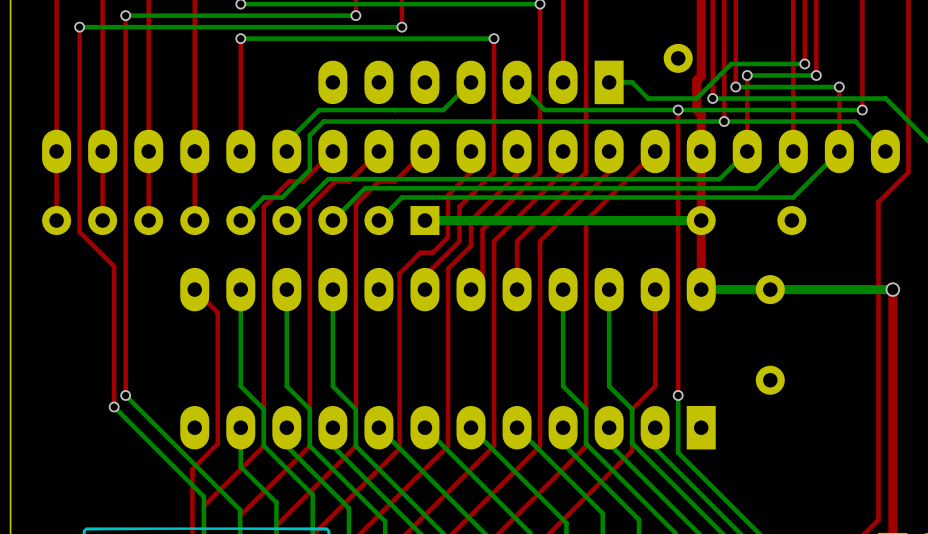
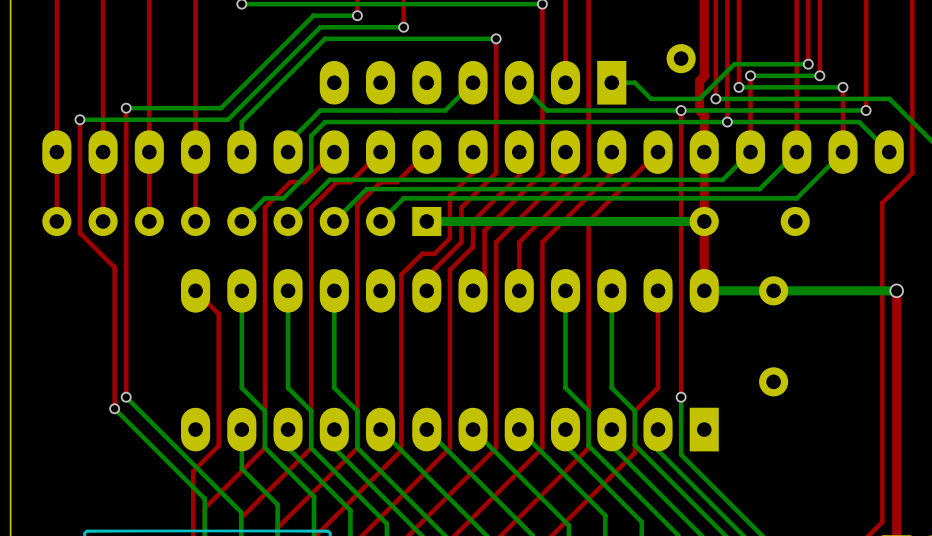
top track: (125, 15) (125, 107) -> none
via: (125, 15) -> none
bottom track: (312, 15) (125, 15) -> (313, 15) (221, 108) (126, 108)
top track: (79, 27) (79, 119) -> none
via: (79, 27) -> none
bottom track: (319, 27) (79, 27) -> (320, 27) (227, 119) (79, 119)
top track: (240, 38) (240, 151) -> none
via: (240, 38) -> none
bottom track: (323, 38) (240, 38) -> (325, 38) (241, 122) (241, 152)
via: none -> (126, 108)
via: none -> (79, 119)

